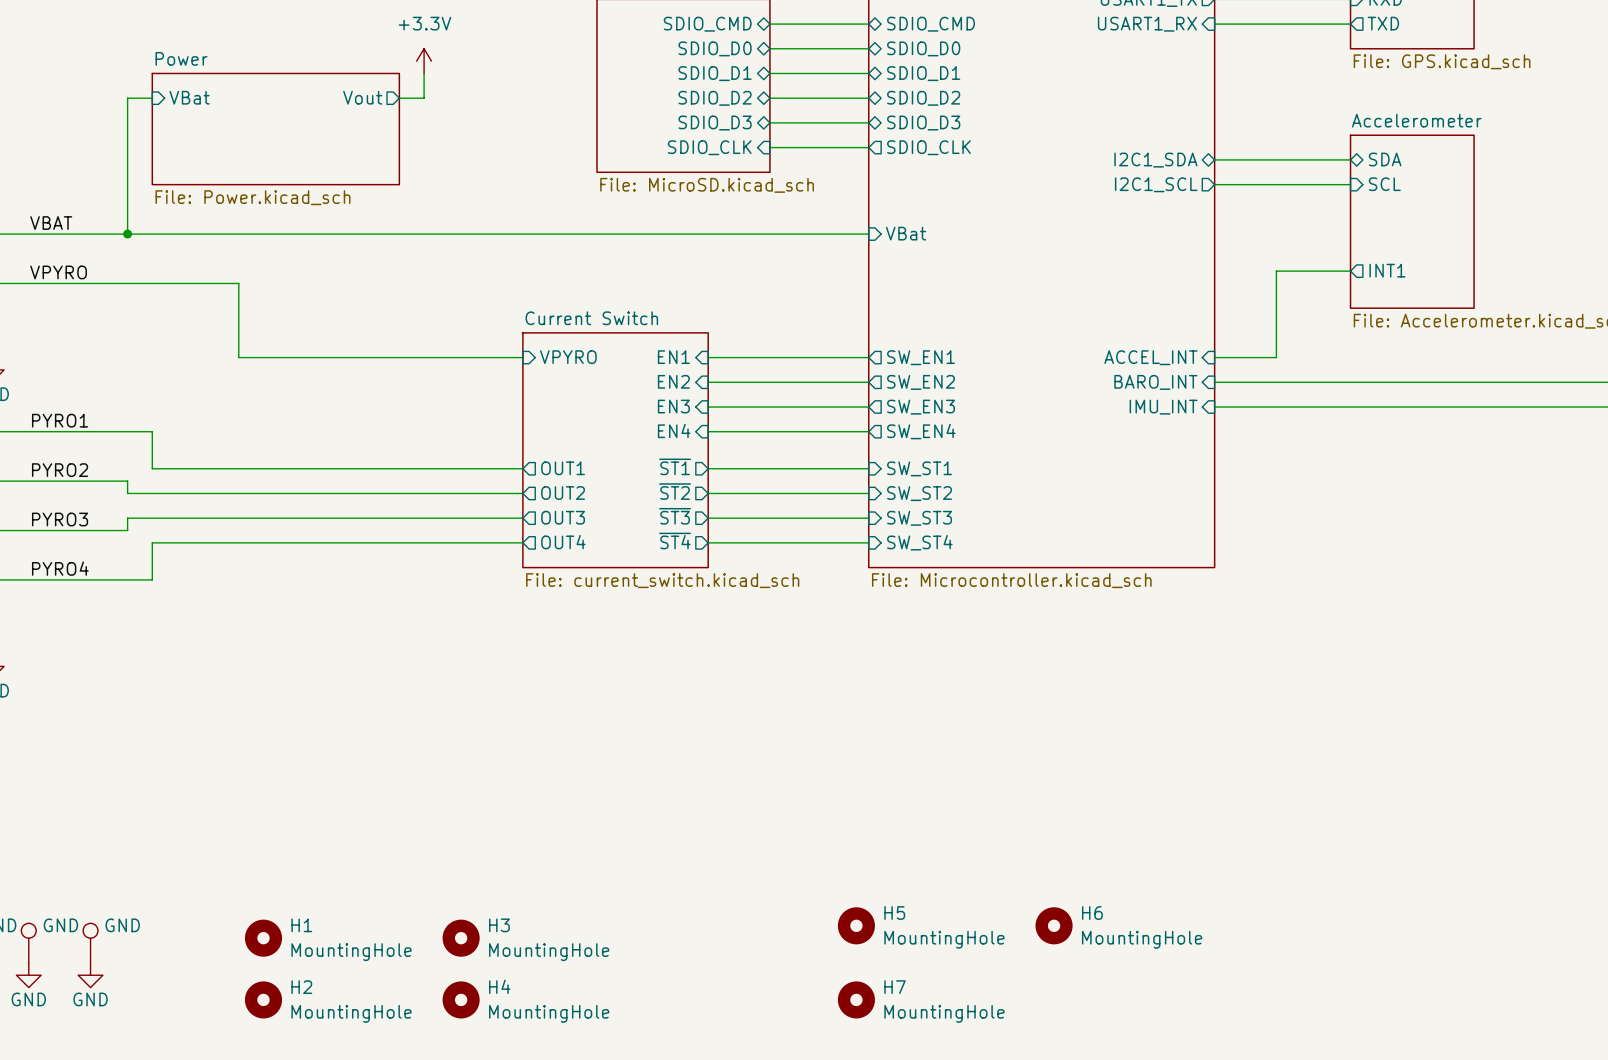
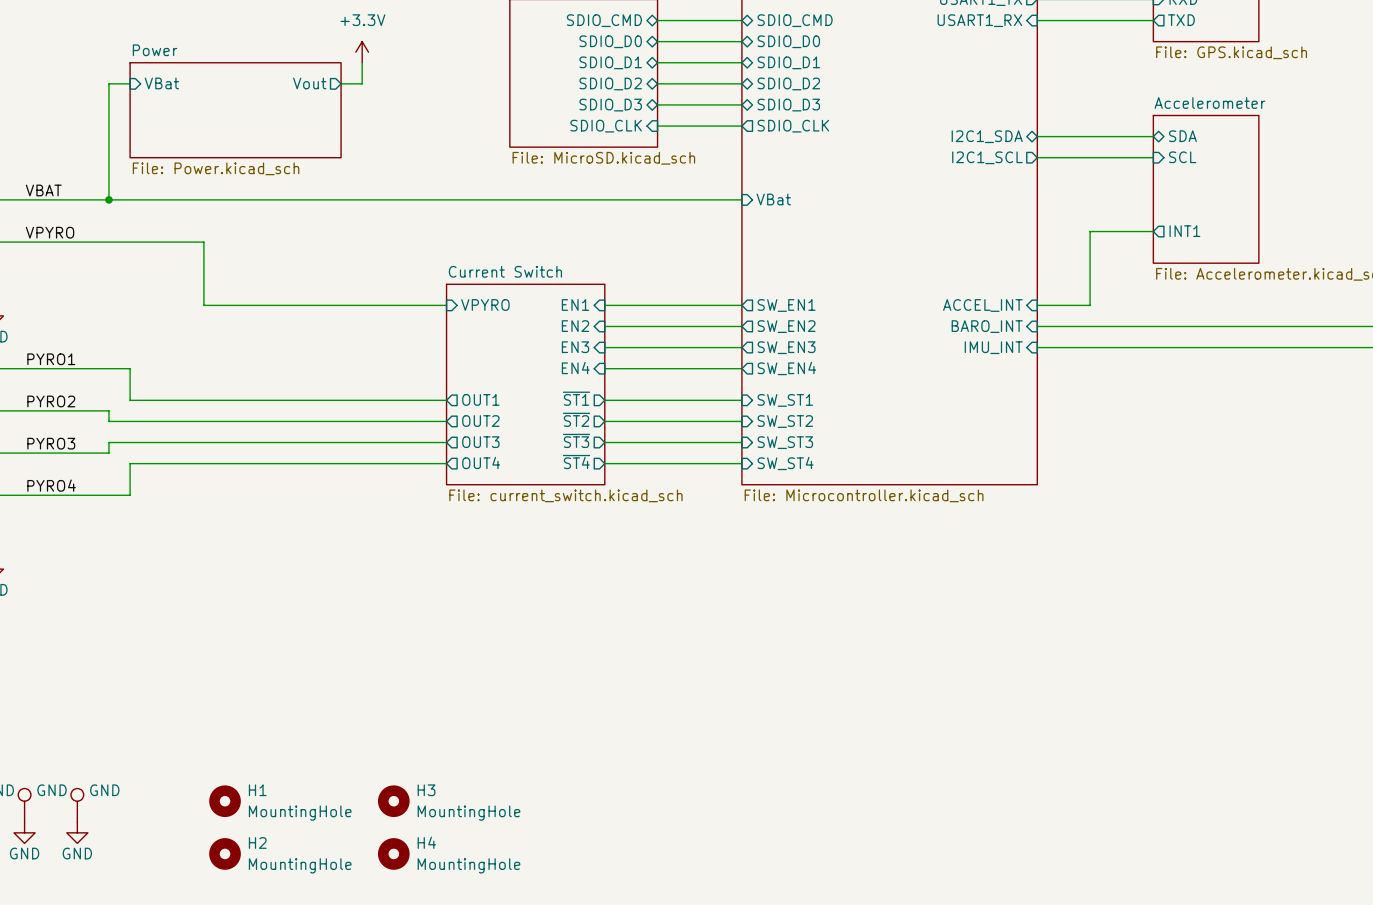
H5: MountingHole (856, 925) -> none
H6: MountingHole (1054, 925) -> none
H7: MountingHole (856, 999) -> none

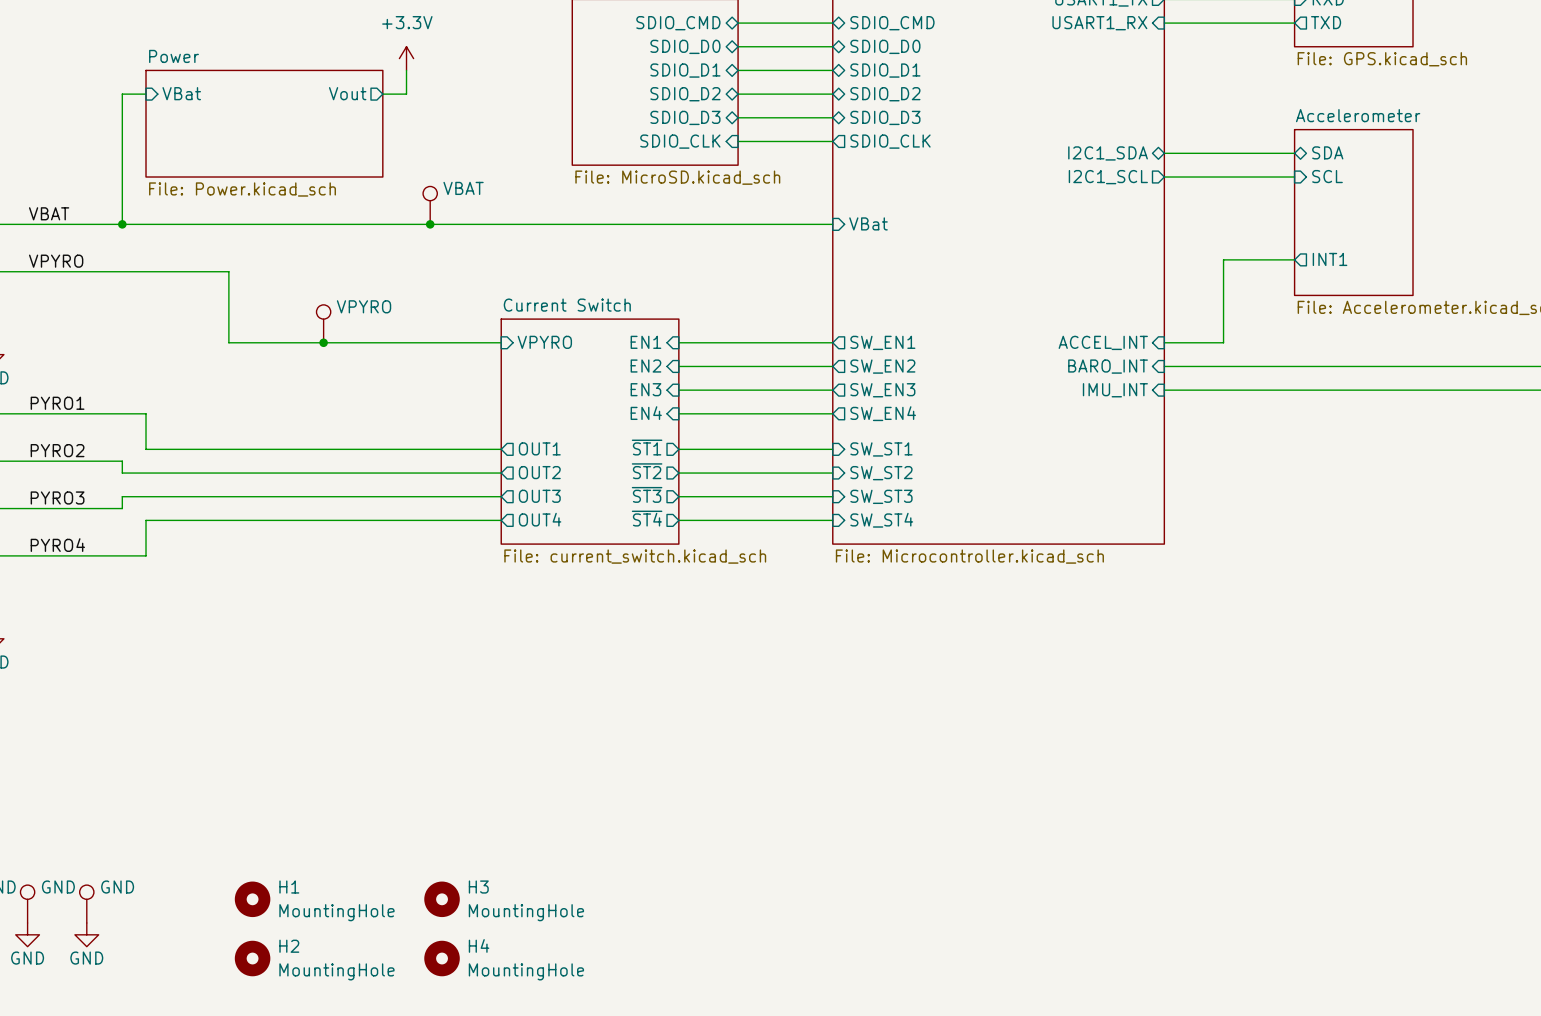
part: none -> VBAT (430, 205)
junction: none -> (430, 224)
part: none -> VPYRO (323, 323)
junction: none -> (323, 342)

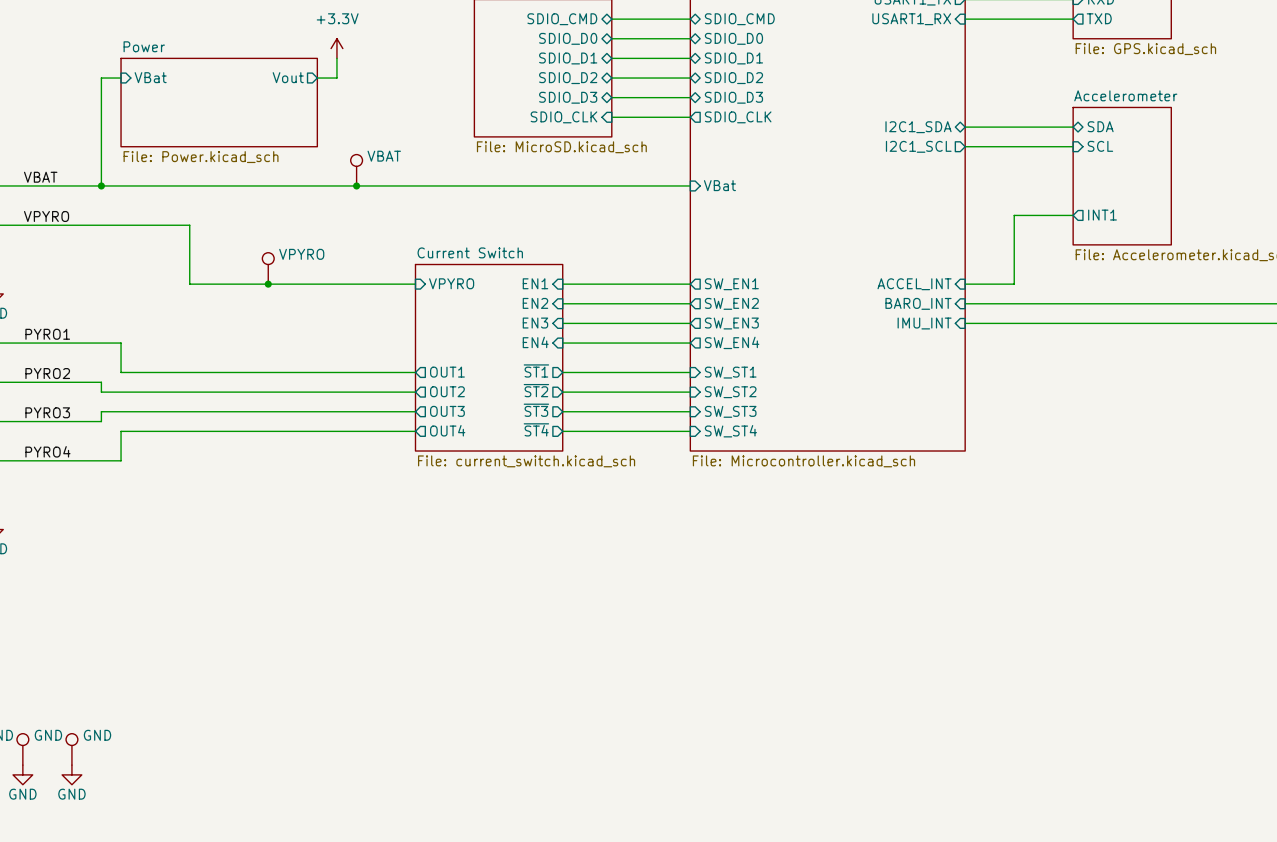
H1: MountingHole (252, 899) -> none
H3: MountingHole (442, 899) -> none
H2: MountingHole (252, 958) -> none
H4: MountingHole (442, 958) -> none

